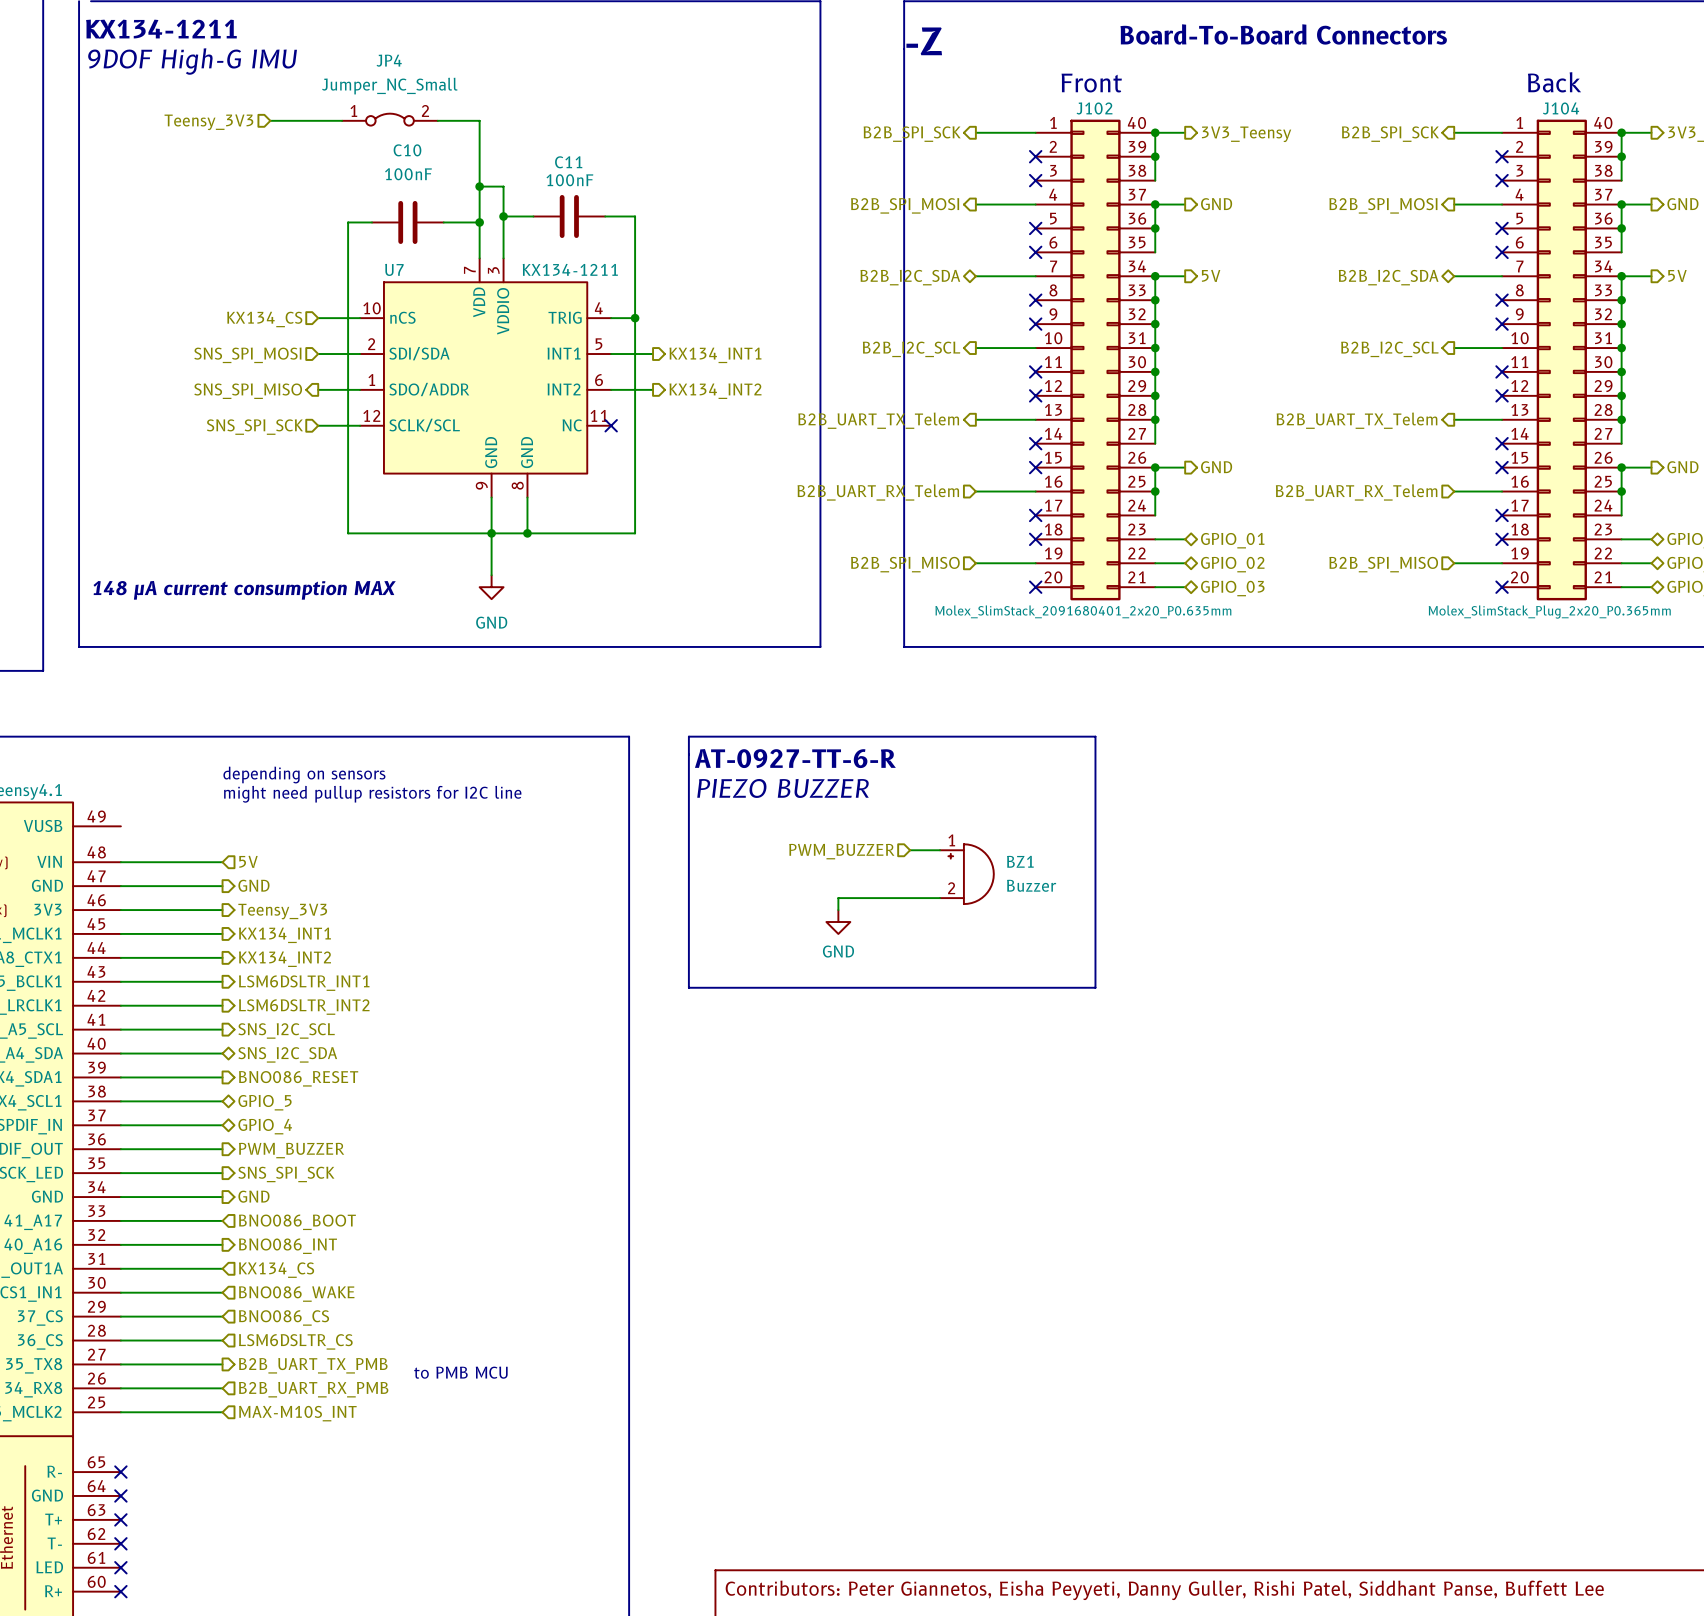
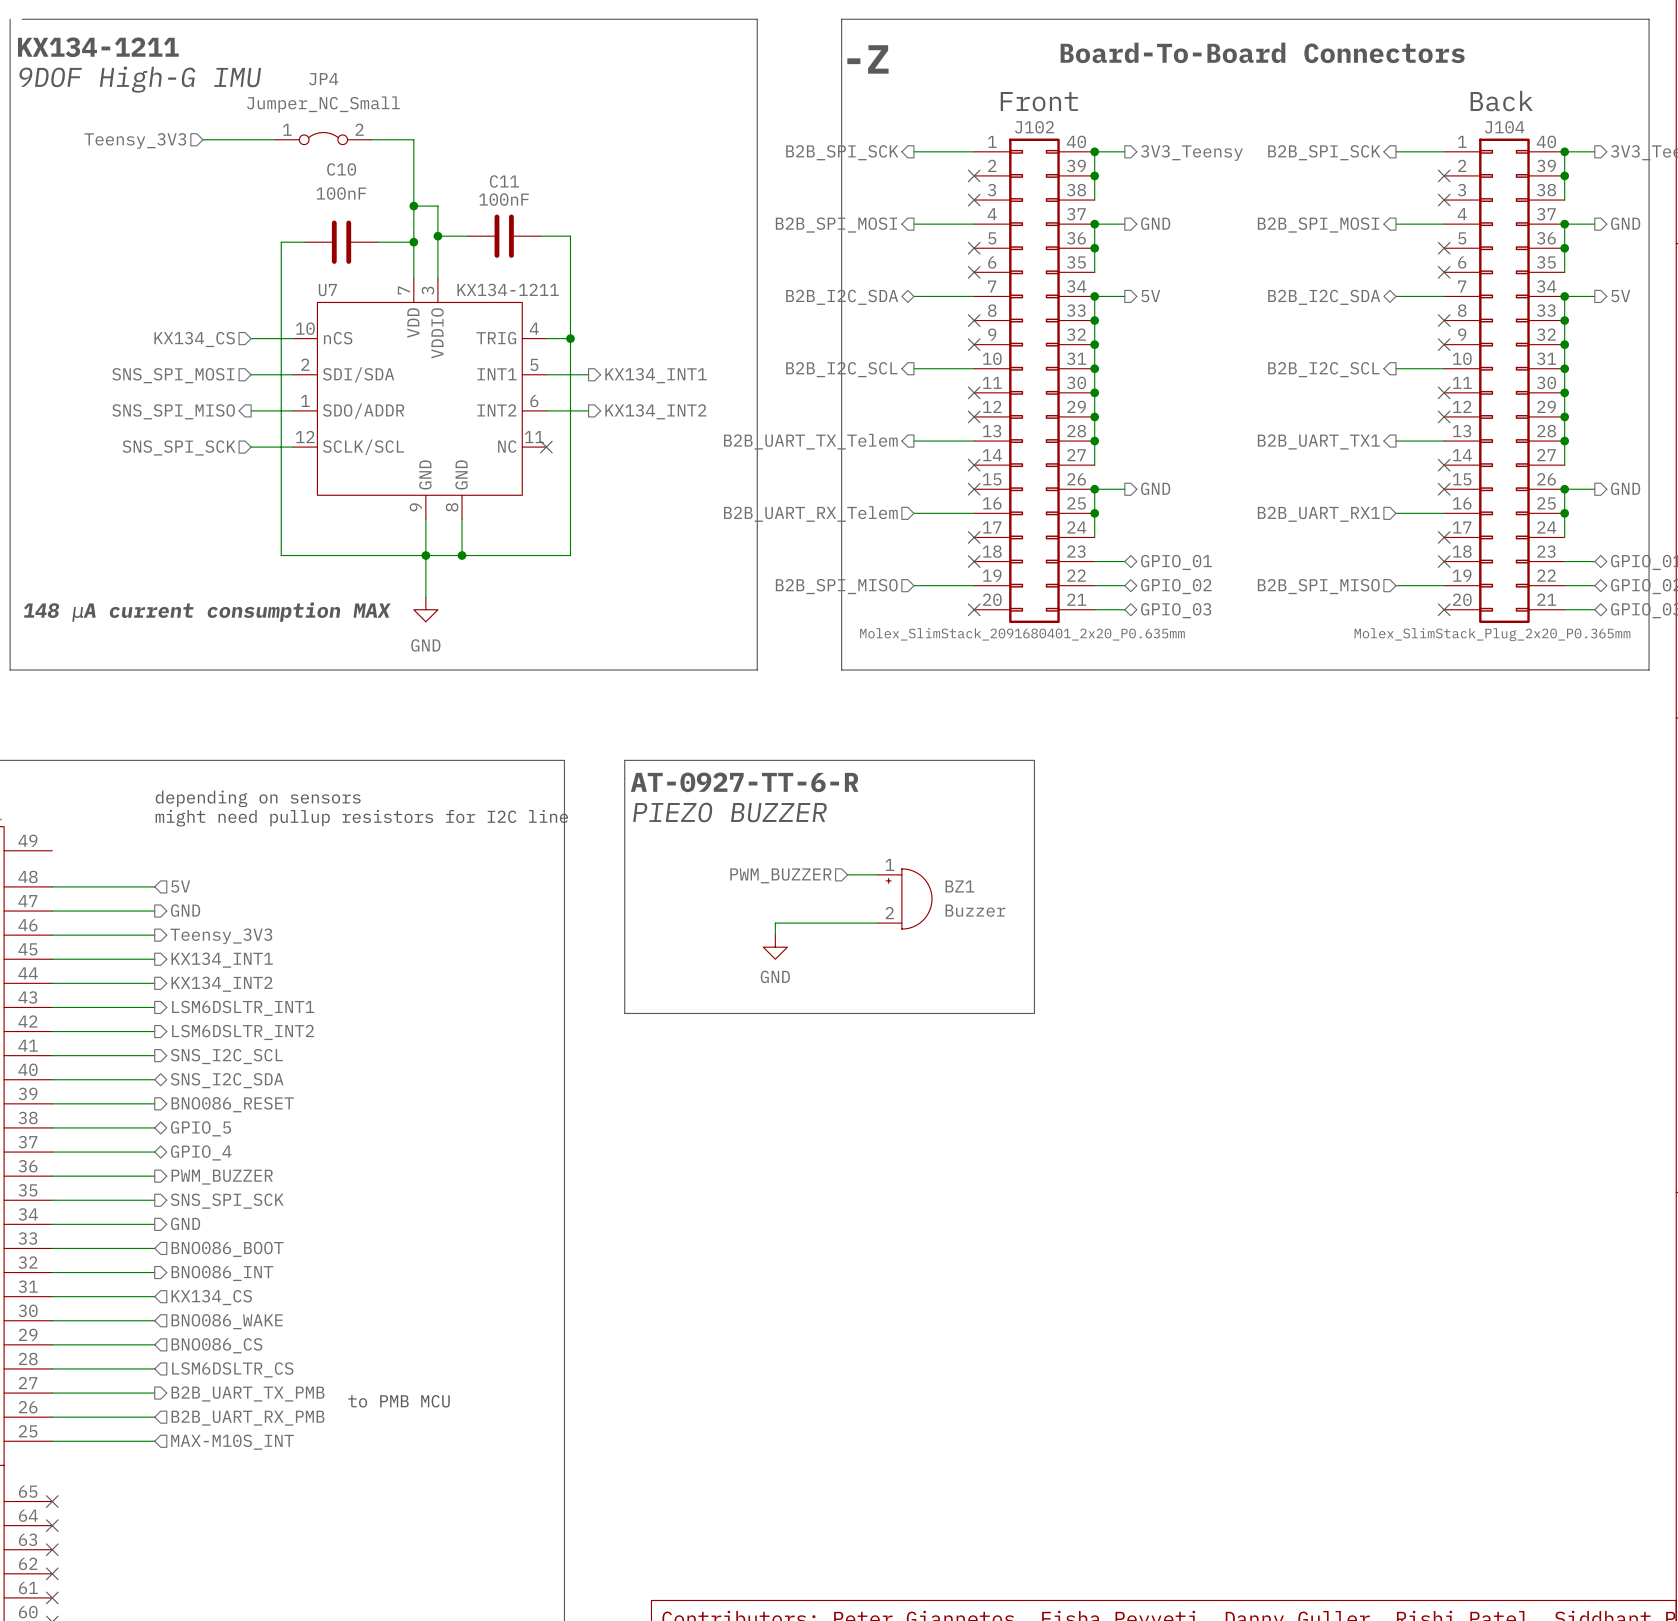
hierarchical label: B2B_UART_TX_Telem (1357, 420) -> B2B_UART_TX1 (1318, 441)
hierarchical label: B2B_UART_RX_Telem (1356, 492) -> B2B_UART_RX1 (1318, 514)

